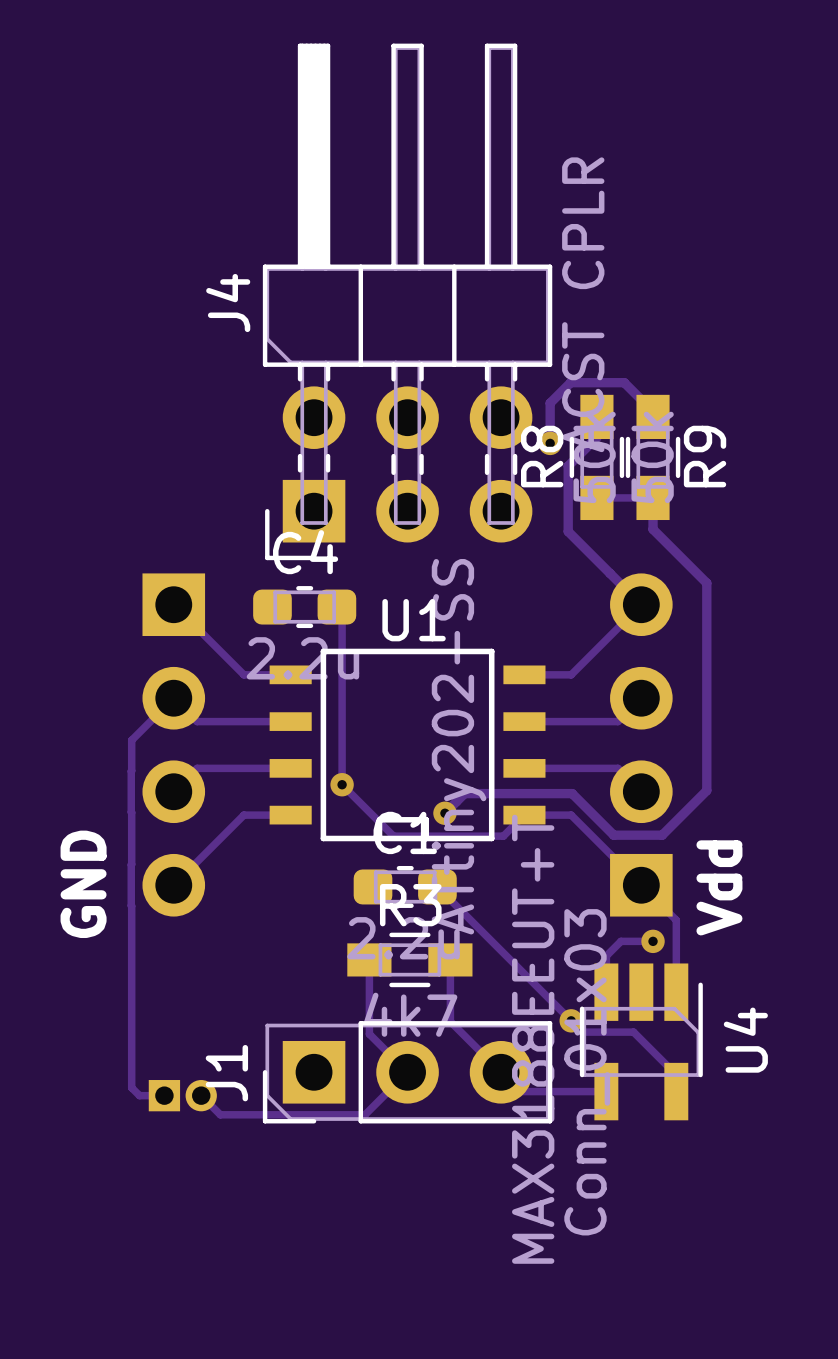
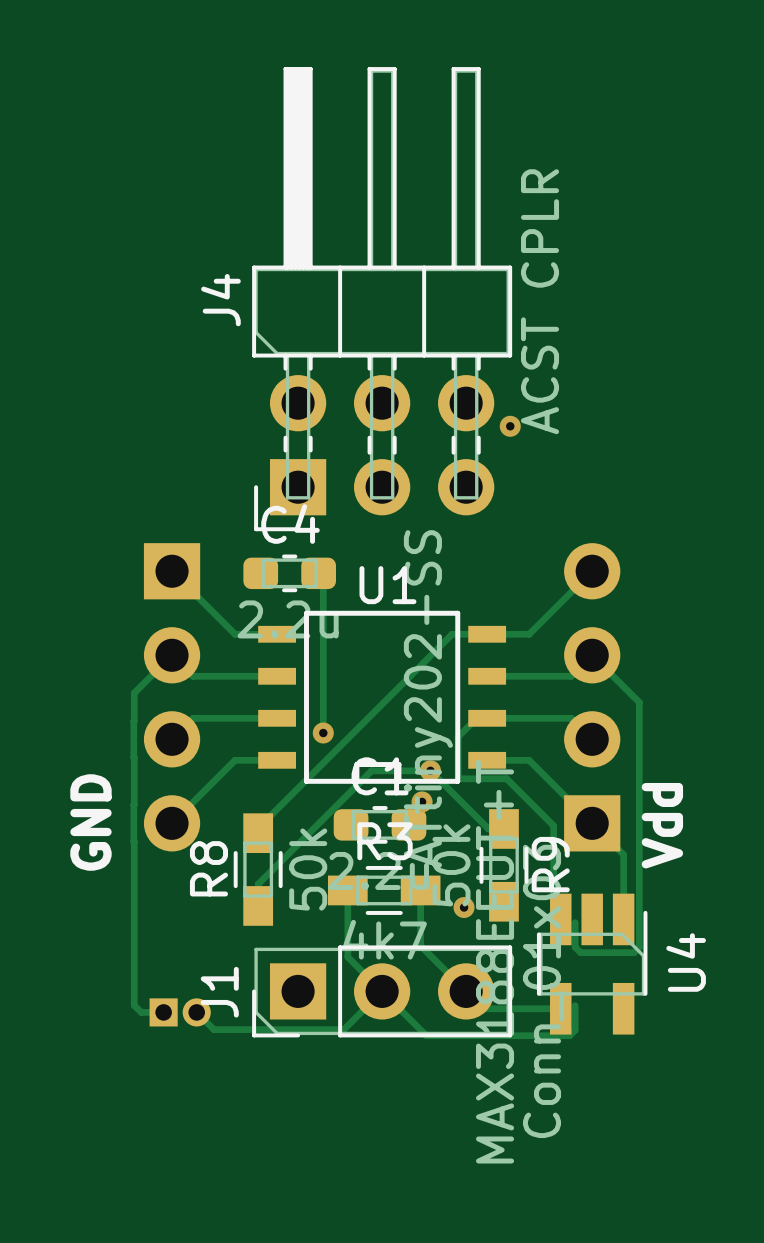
track: (596, 416) (596, 437) (568, 466) (568, 531) (641, 604) -> none
track: (653, 416) (653, 411) (624, 382) (570, 382) (550, 403) (550, 443) -> none
R8 position: (596, 457) -> (258, 869)
R9 position: (653, 457) -> (503, 865)
track: (596, 497) (653, 497) (653, 529) (706, 583) (706, 790) (662, 835) (613, 835) (572, 793) (464, 793) (444, 813) -> none
track: none -> (487, 634) (452, 634) (258, 828) (258, 833)
track: none -> (592, 655) (639, 702) (639, 947) (634, 952) (580, 952) (575, 947) (575, 922)
track: none -> (487, 718) (476, 718) (458, 736) (458, 776) (460, 778) (506, 778) (553, 825) (553, 922)
track: (342, 784) (393, 836) (503, 836) (524, 815) -> none
via position: (444, 813) -> (430, 770)
via: none -> (422, 801)
track: (437, 886) (582, 1032) (633, 1032) (676, 1074) (676, 1091) -> none
track: none -> (503, 828) (488, 828) (430, 770) (371, 770) (258, 884) (258, 905)
track: (653, 941) (620, 941) (606, 955) (606, 993) -> none
via: (653, 941) -> none
via: none -> (464, 907)
via: (571, 1020) -> none
track: none -> (382, 991) (426, 1035) (569, 1035) (575, 1030) (575, 1005)

